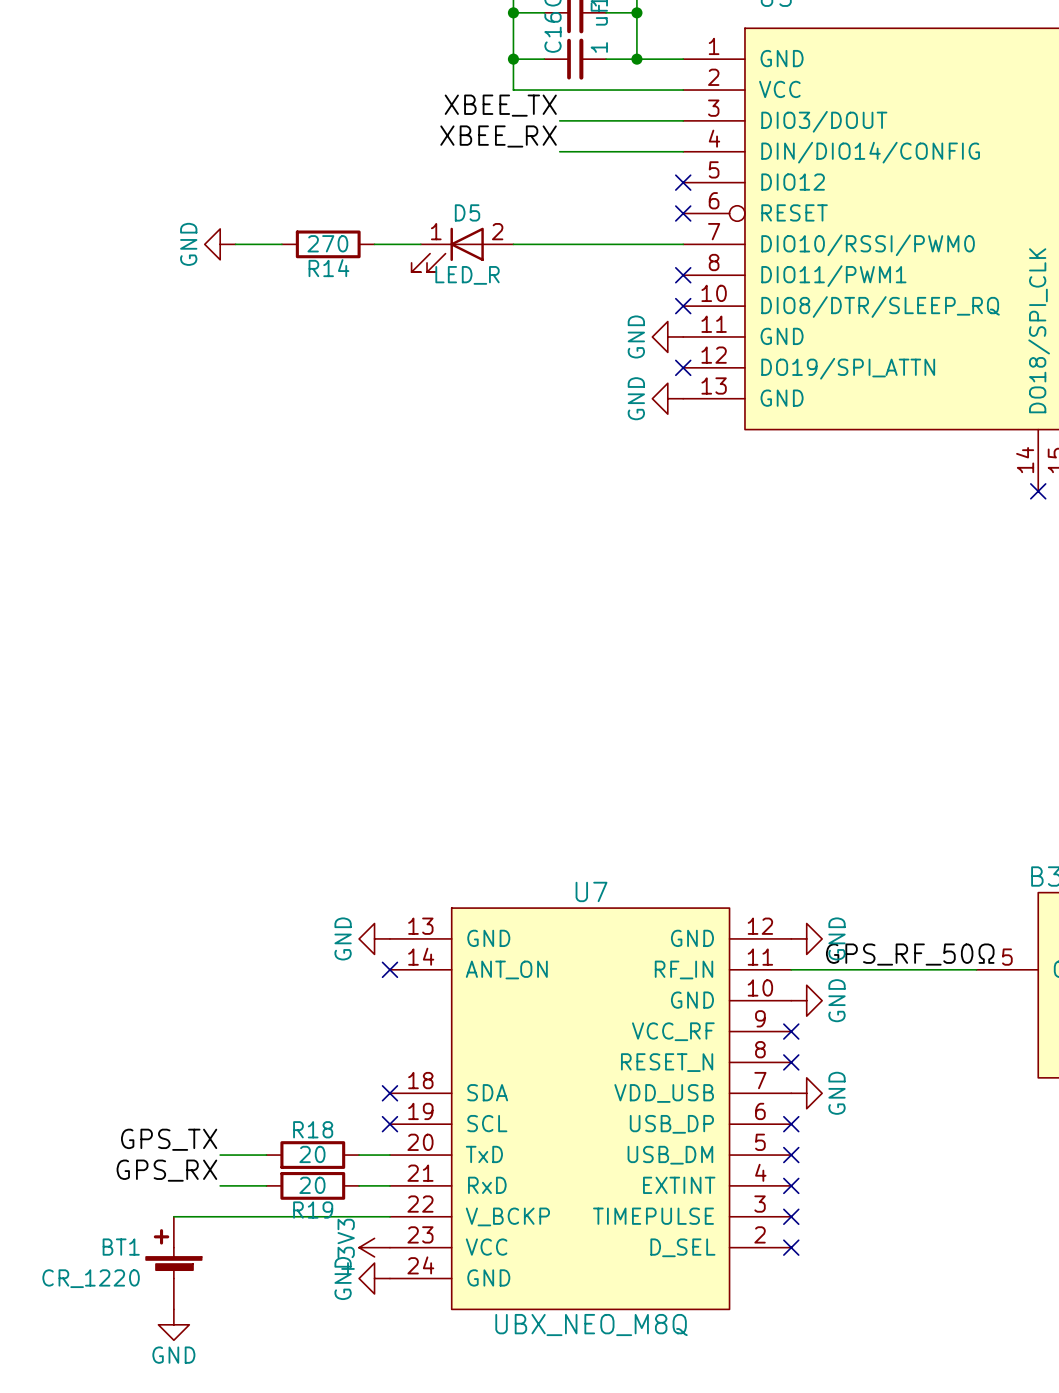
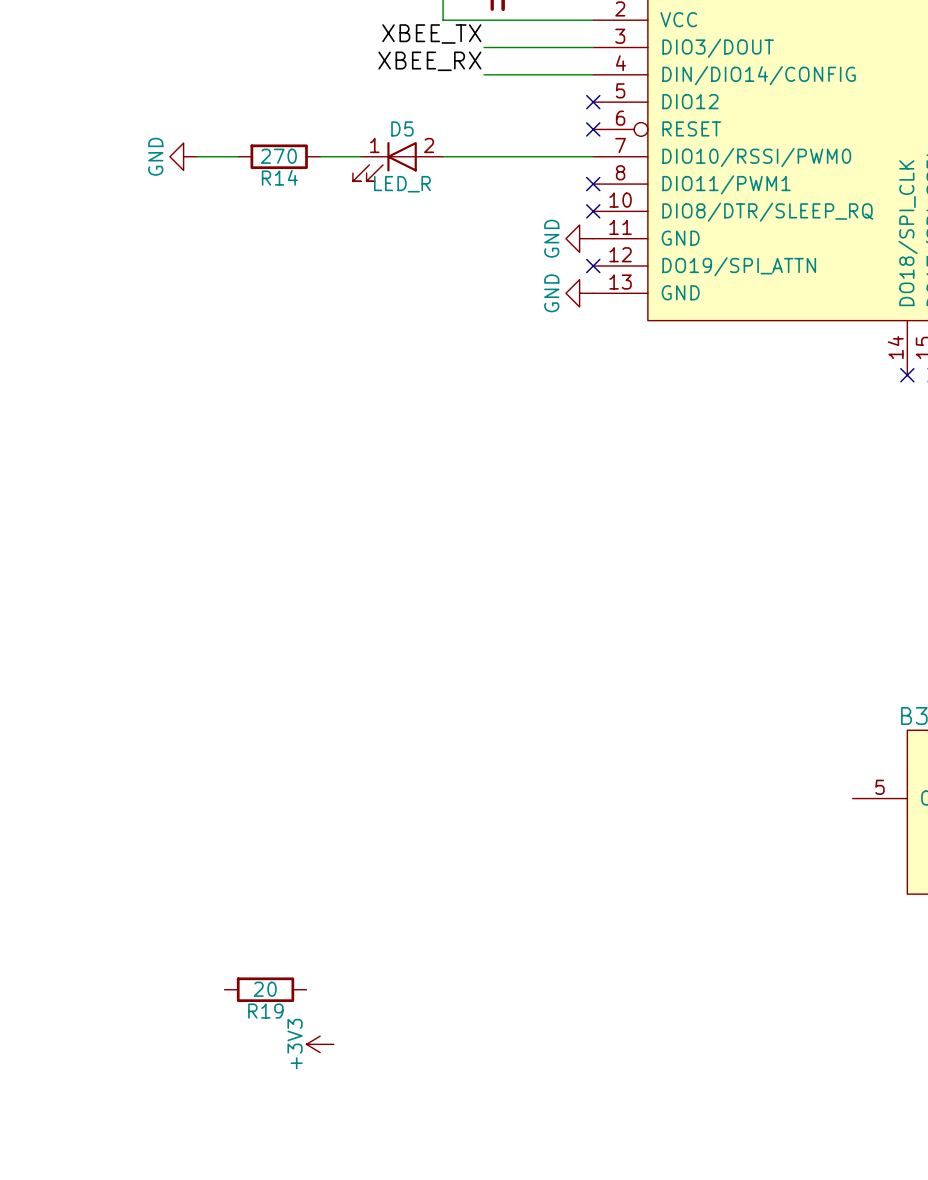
power symbol: GND (374, 938) -> none
power symbol: GND (806, 938) -> none
label: GPS_RF_50Ω (910, 954) -> none
no-connect mark: (389, 969) -> none
wire: (791, 969) (976, 969) -> none
power symbol: GND (806, 1000) -> none
no-connect mark: (791, 1031) -> none
no-connect mark: (791, 1062) -> none
no-connect mark: (389, 1093) -> none
power symbol: GND (806, 1093) -> none
U7: UBX_NEO_M8Q (590, 1108) -> none
no-connect mark: (389, 1124) -> none
no-connect mark: (791, 1124) -> none
label: GPS_TX (169, 1139) -> none
wire: (220, 1155) (266, 1155) -> none
R18: 20 (312, 1155) -> none
wire: (359, 1155) (389, 1155) -> none
no-connect mark: (791, 1155) -> none
label: GPS_RX (166, 1170) -> none
wire: (220, 1185) (266, 1185) -> none
wire: (359, 1185) (389, 1185) -> none
no-connect mark: (791, 1185) -> none
wire: (173, 1216) (389, 1216) -> none
no-connect mark: (791, 1216) -> none
no-connect mark: (791, 1247) -> none
BT1: CR_1220 (173, 1263) -> none
power symbol: GND (374, 1278) -> none
power symbol: GND (173, 1324) -> none

